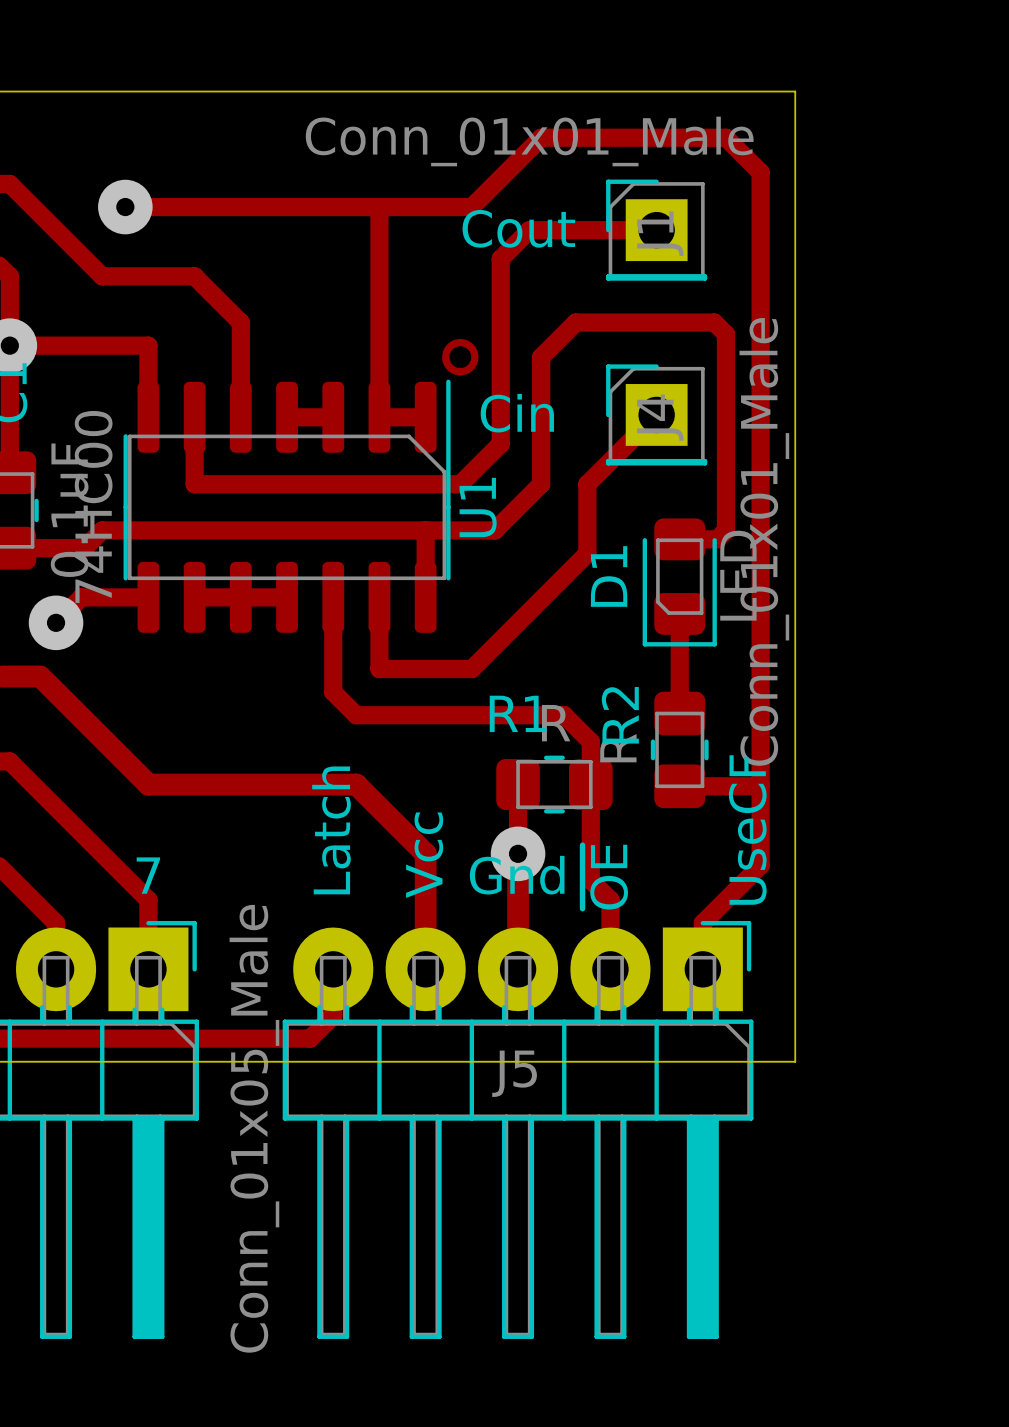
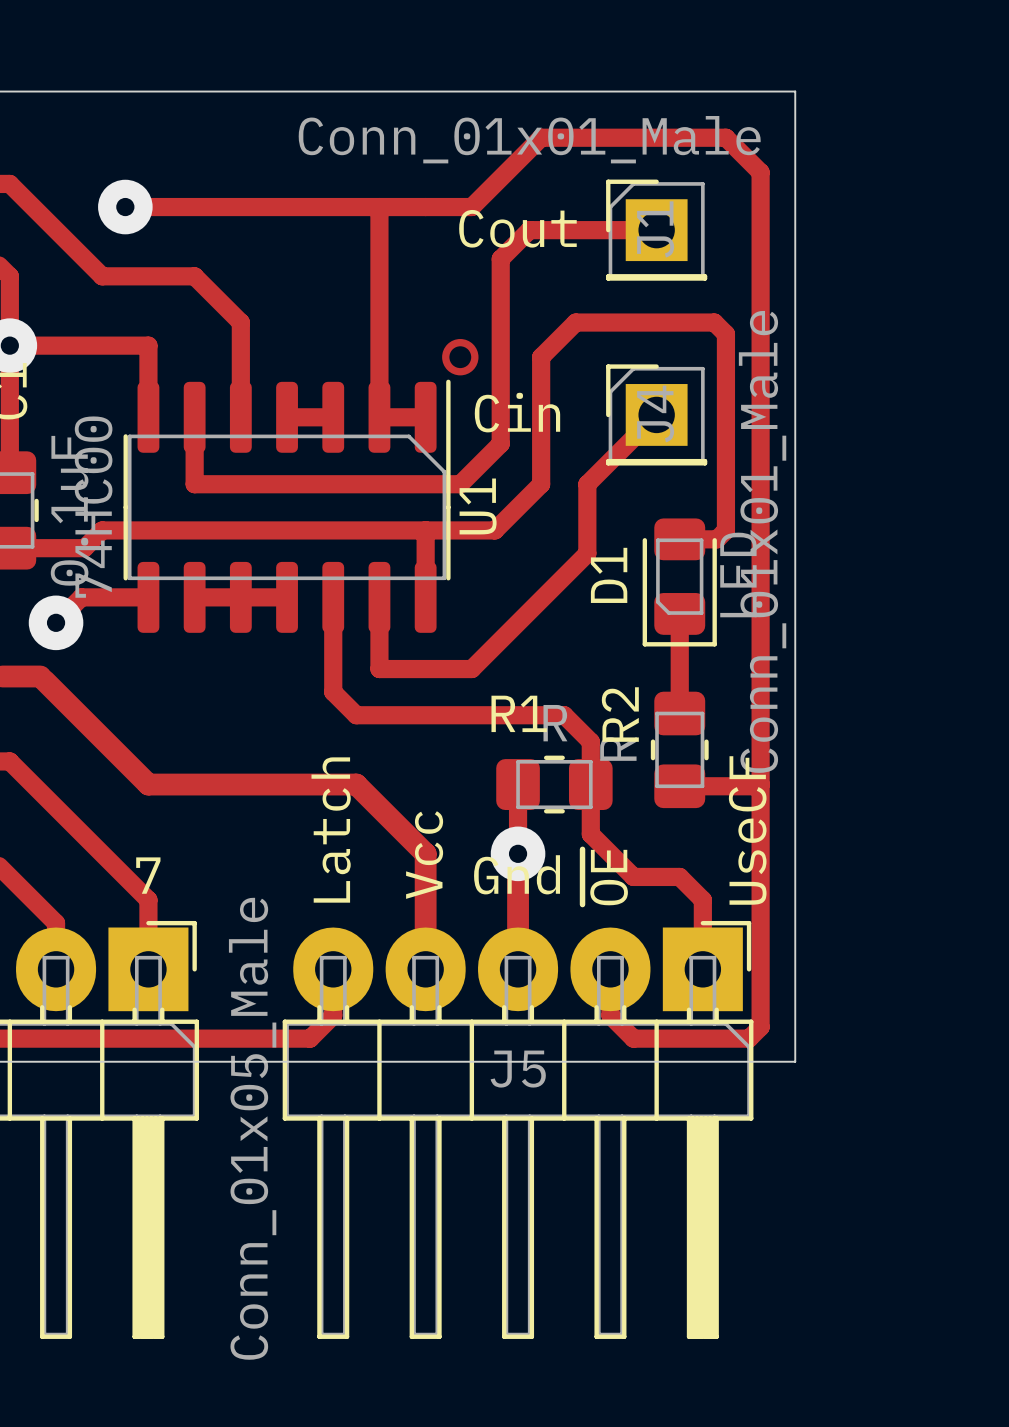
track: (590, 834) (590, 880) (610, 900) (610, 969) -> (590, 834) (633, 876) (679, 876) (702, 900) (702, 923)
track: (760, 865) (702, 923) -> (760, 865) (760, 1027) (749, 1038) (633, 1038) (610, 1015) (610, 969)

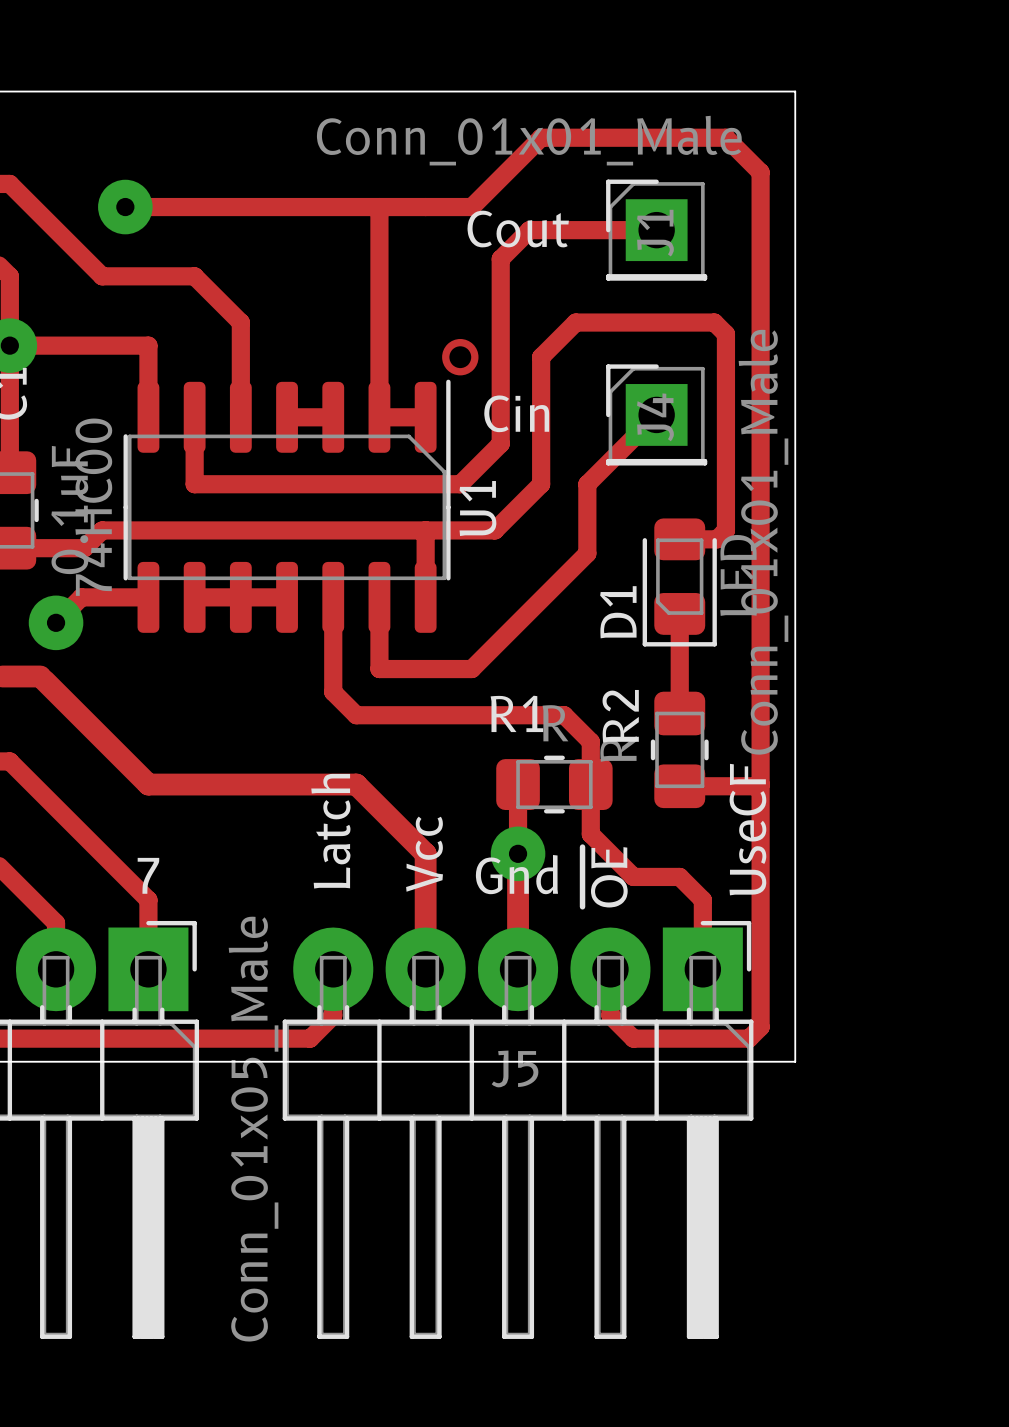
D1 name position: D1 (609, 575) -> D1 (618, 612)

